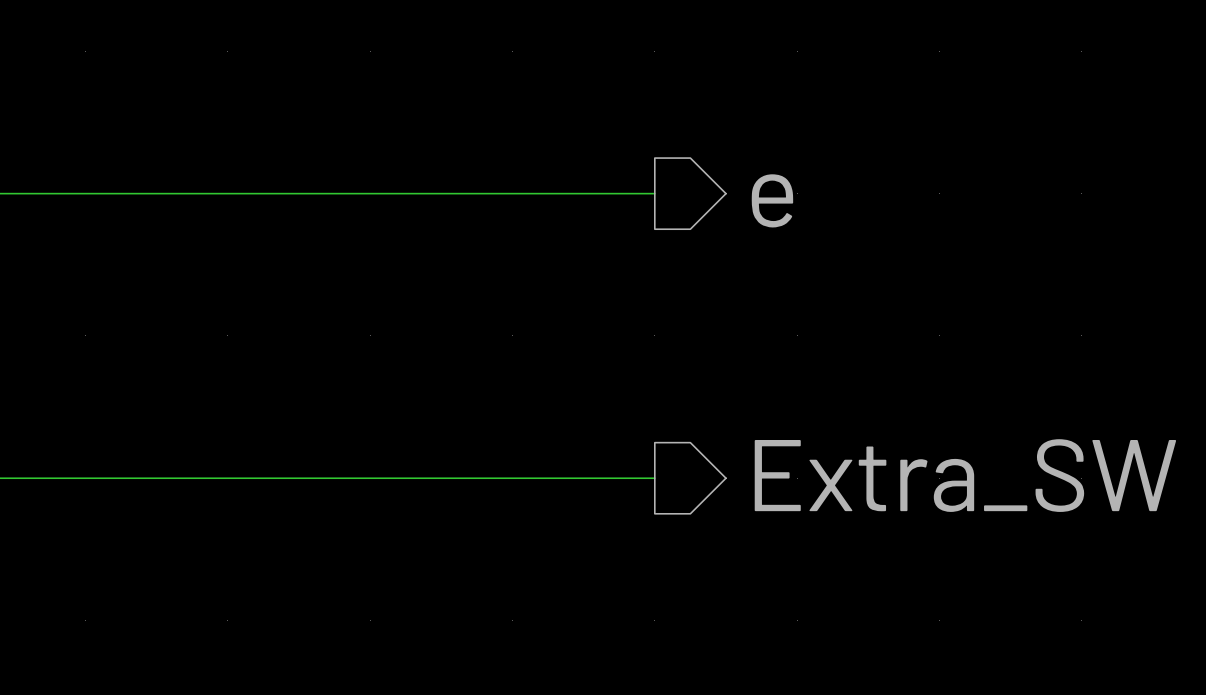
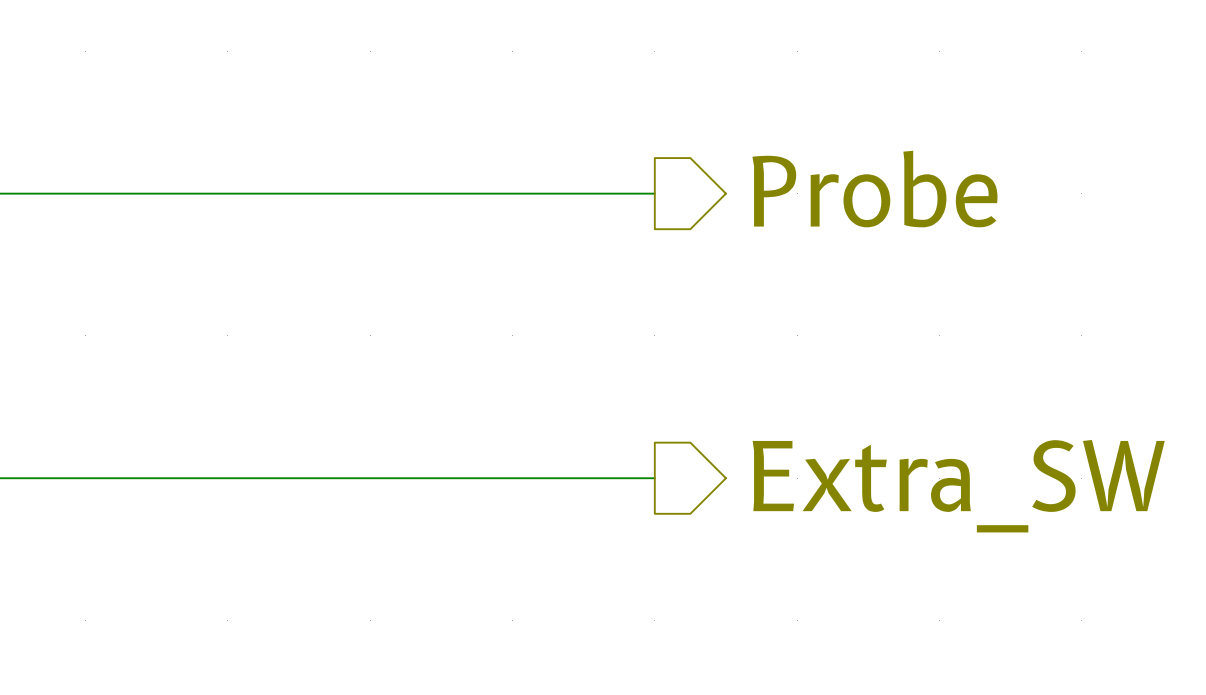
hierarchical label: e (772, 200) -> Probe (874, 189)

